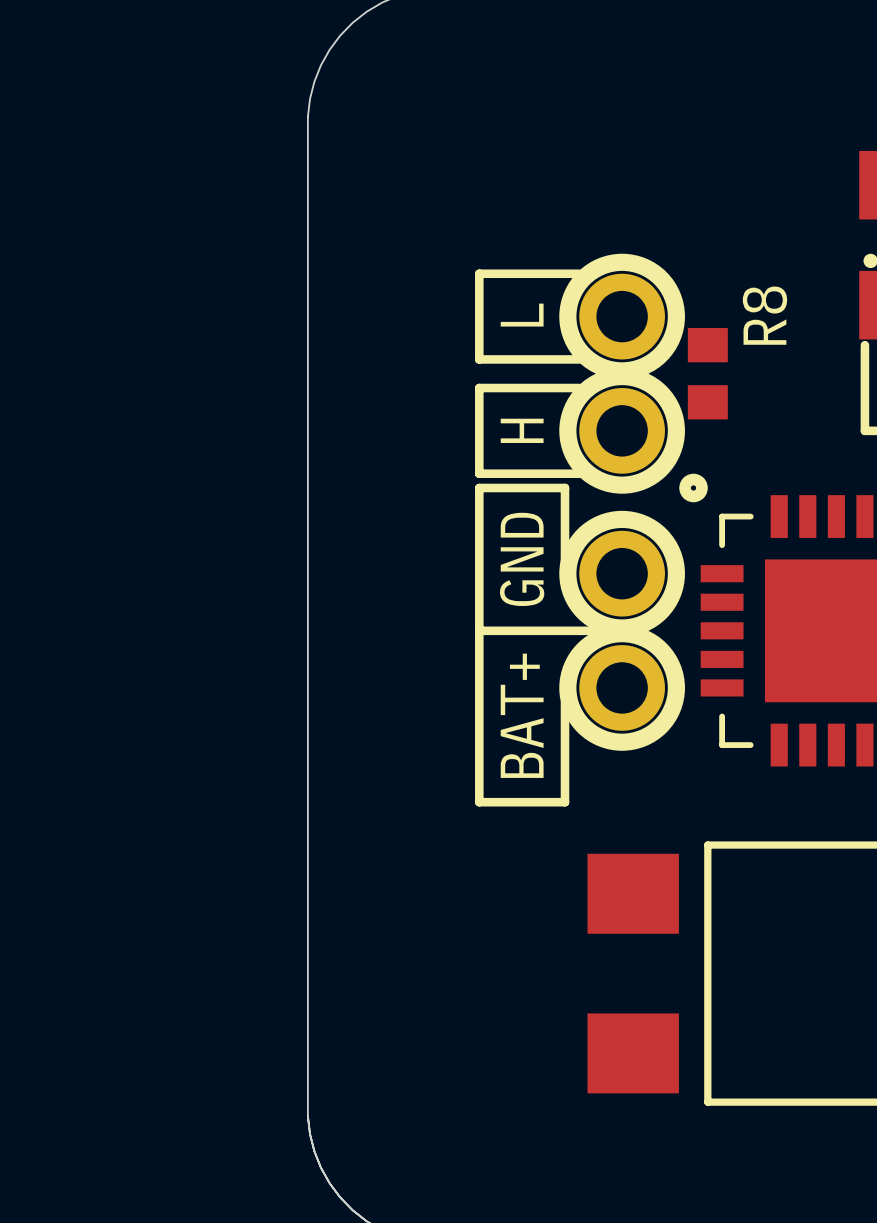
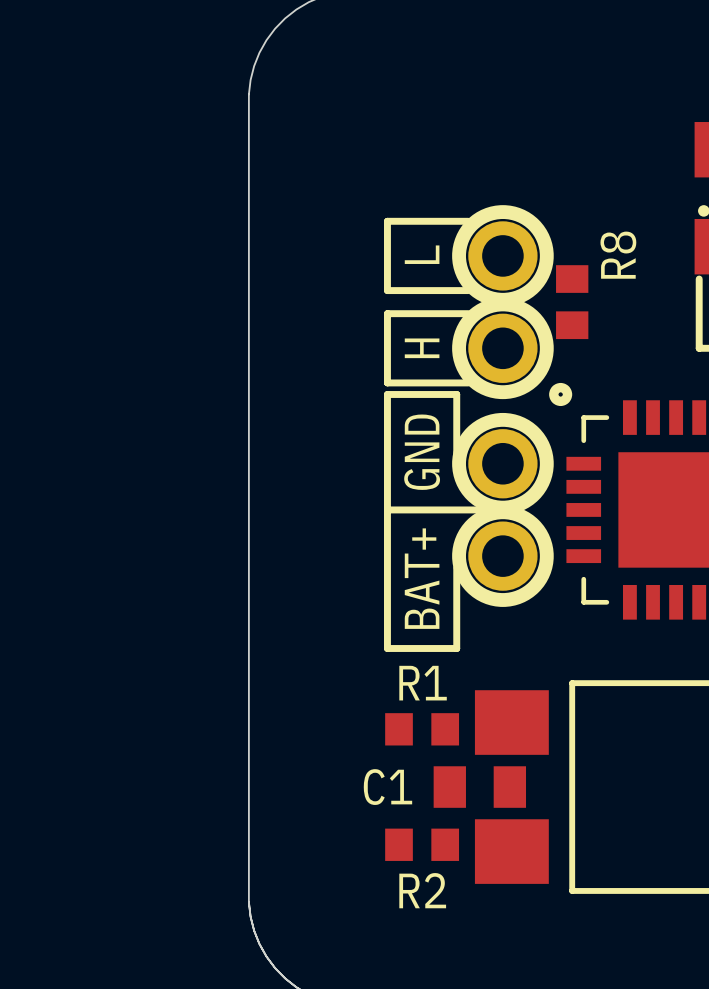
R1: none -> (422, 729)
C1: none -> (479, 787)
R2: none -> (422, 844)

